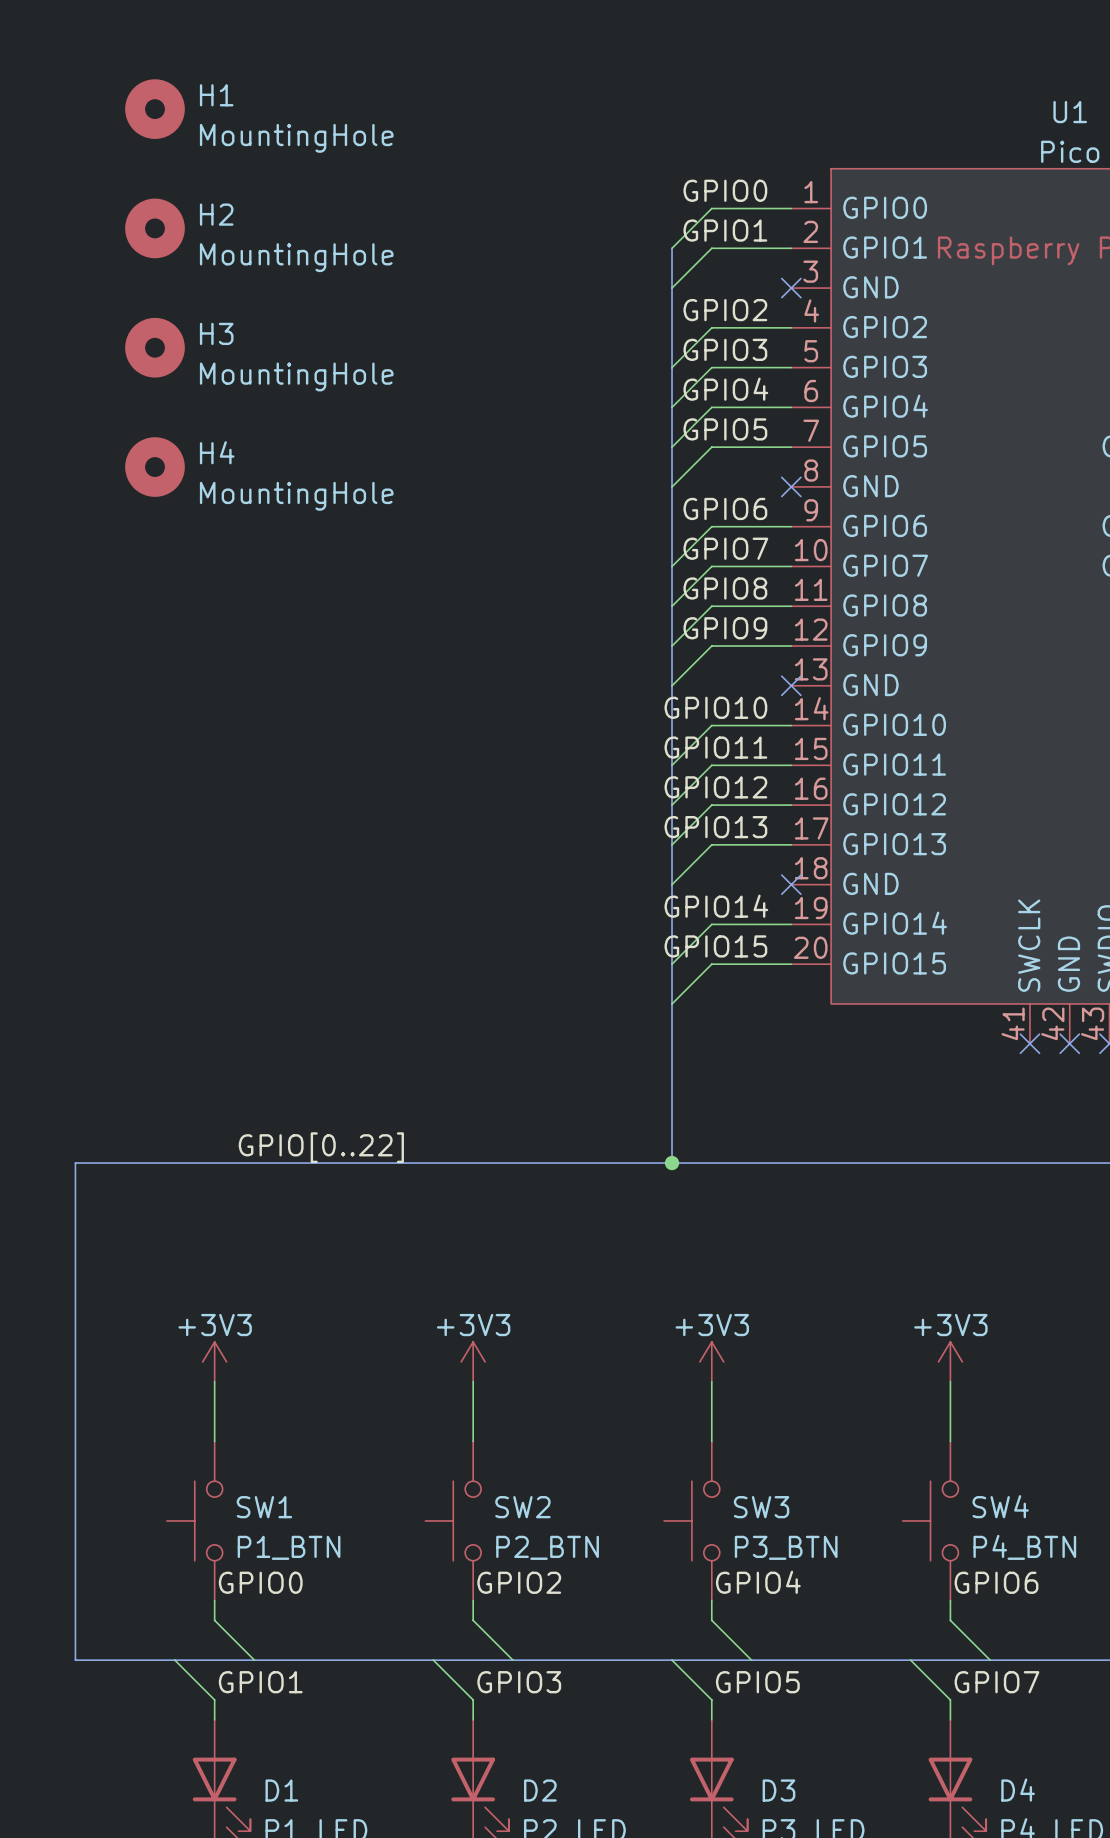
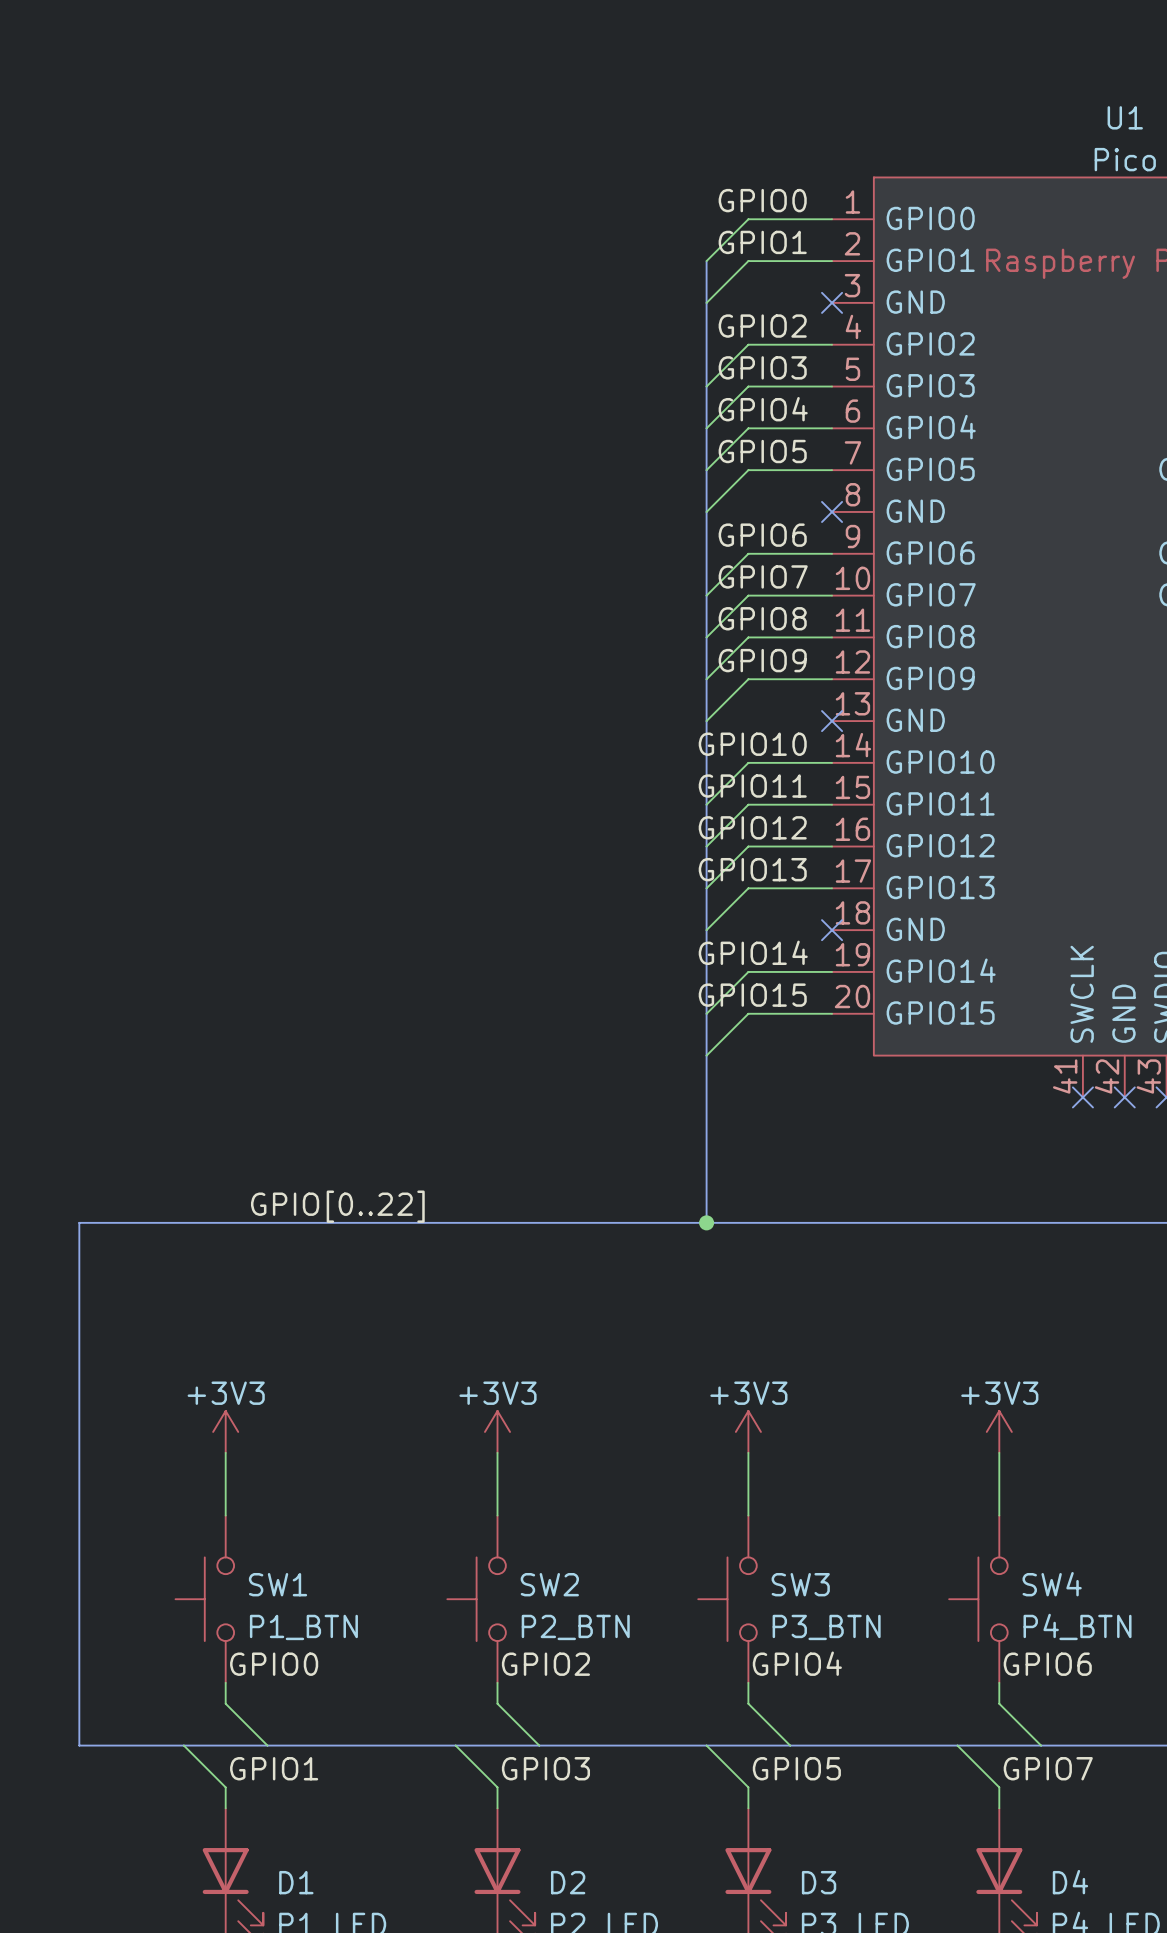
H1: MountingHole (154, 109) -> none
H2: MountingHole (154, 228) -> none
H3: MountingHole (154, 347) -> none
H4: MountingHole (154, 467) -> none

